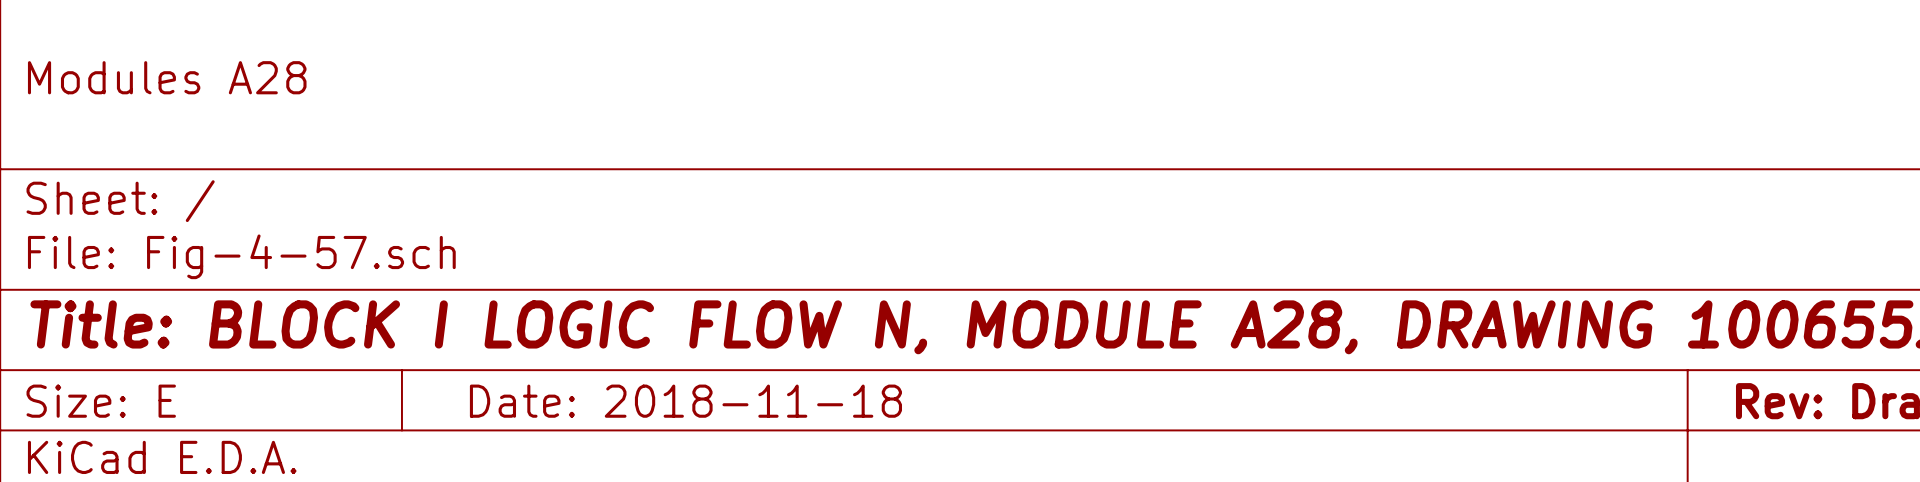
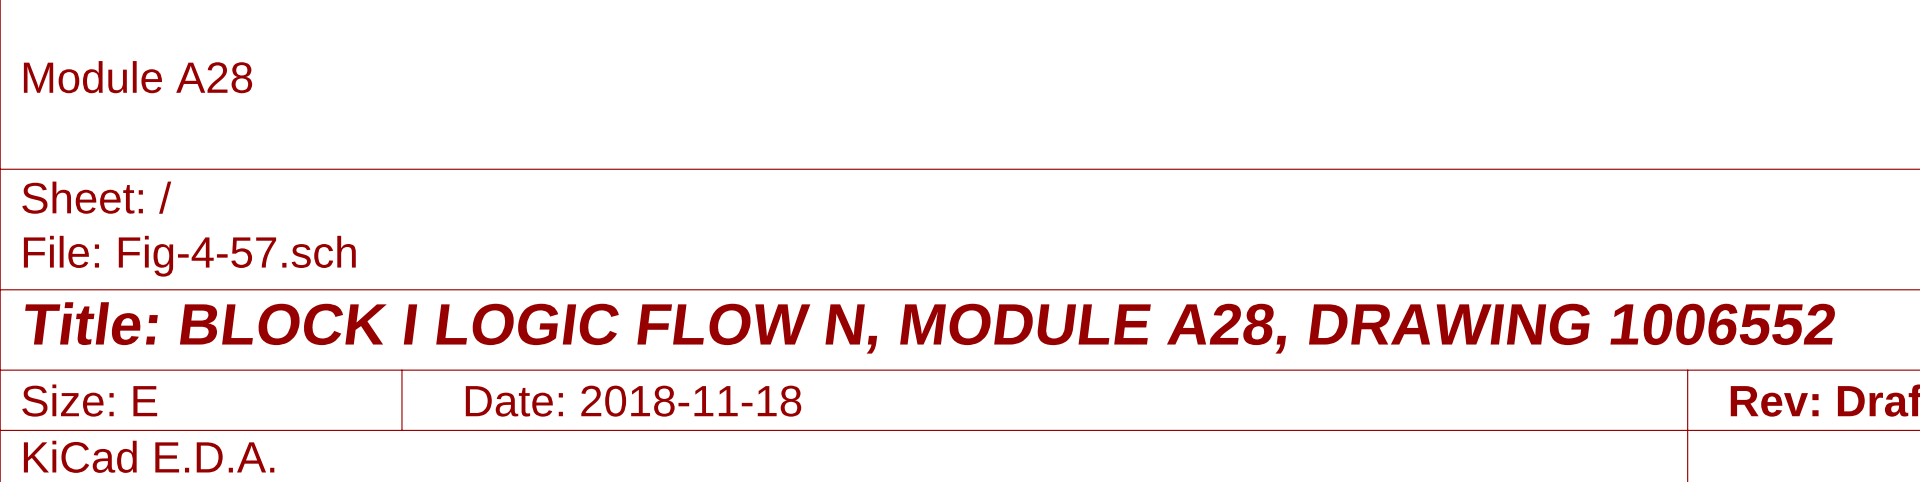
title block: Modules A28 (167, 77) -> Module A28 (138, 77)

